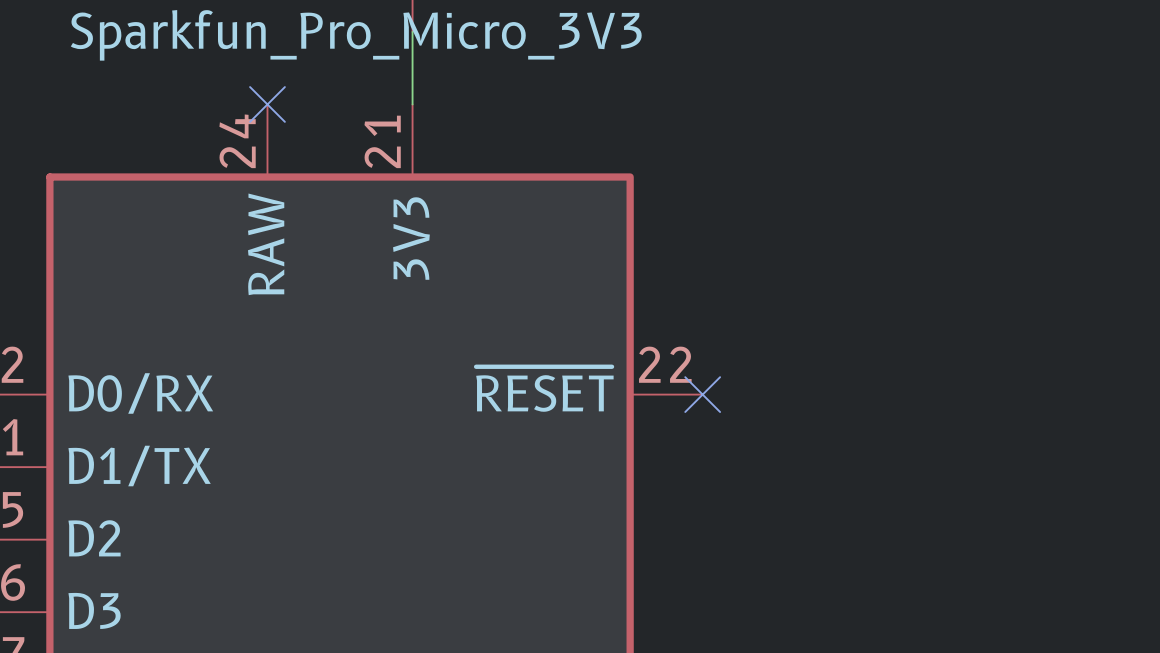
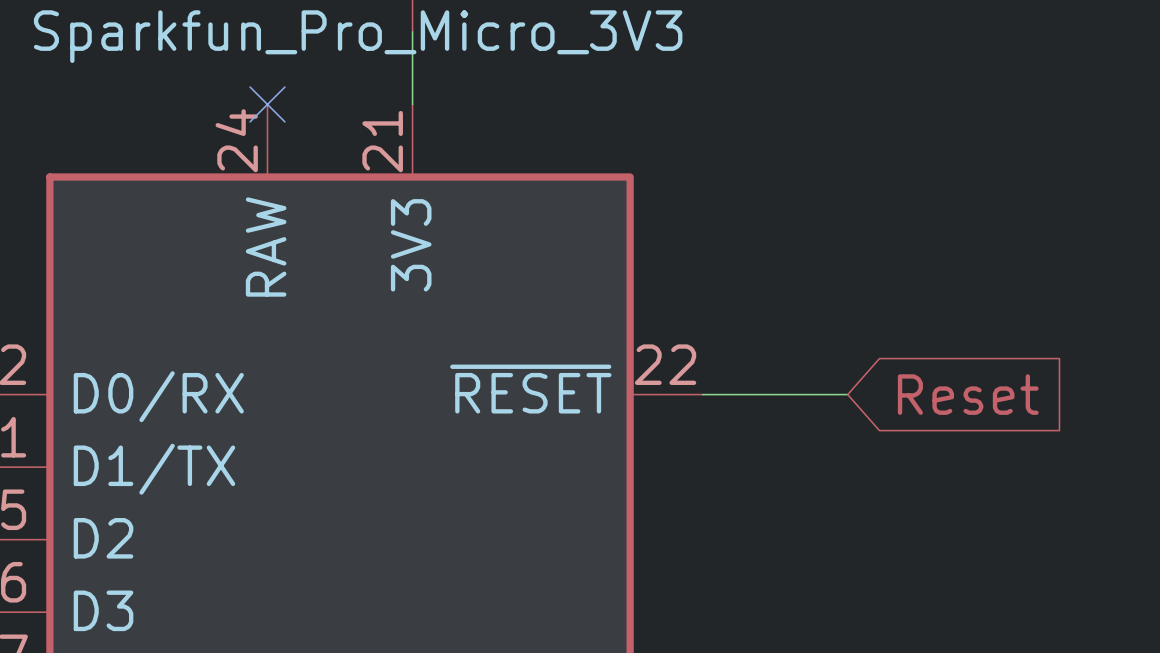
wire: none -> (702, 394) (847, 394)
no-connect mark: (702, 394) -> none
global label: none -> Reset (968, 394)

